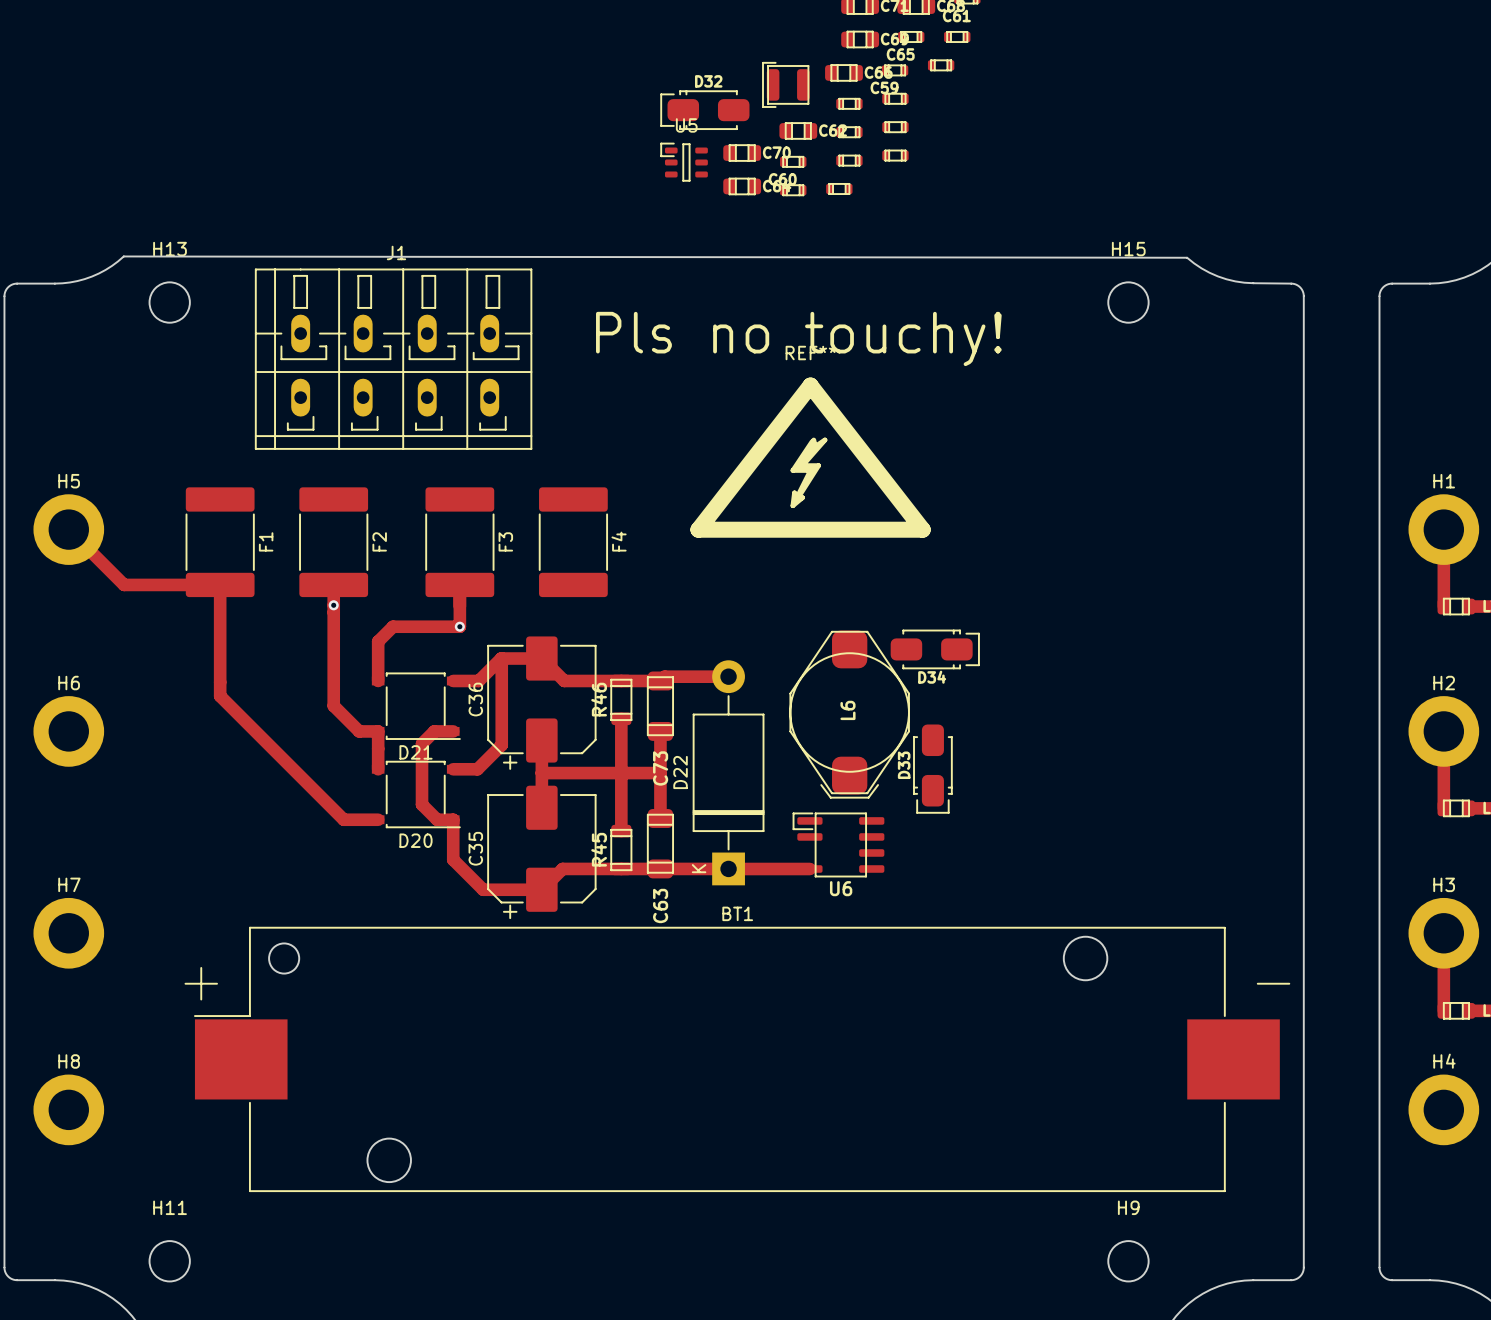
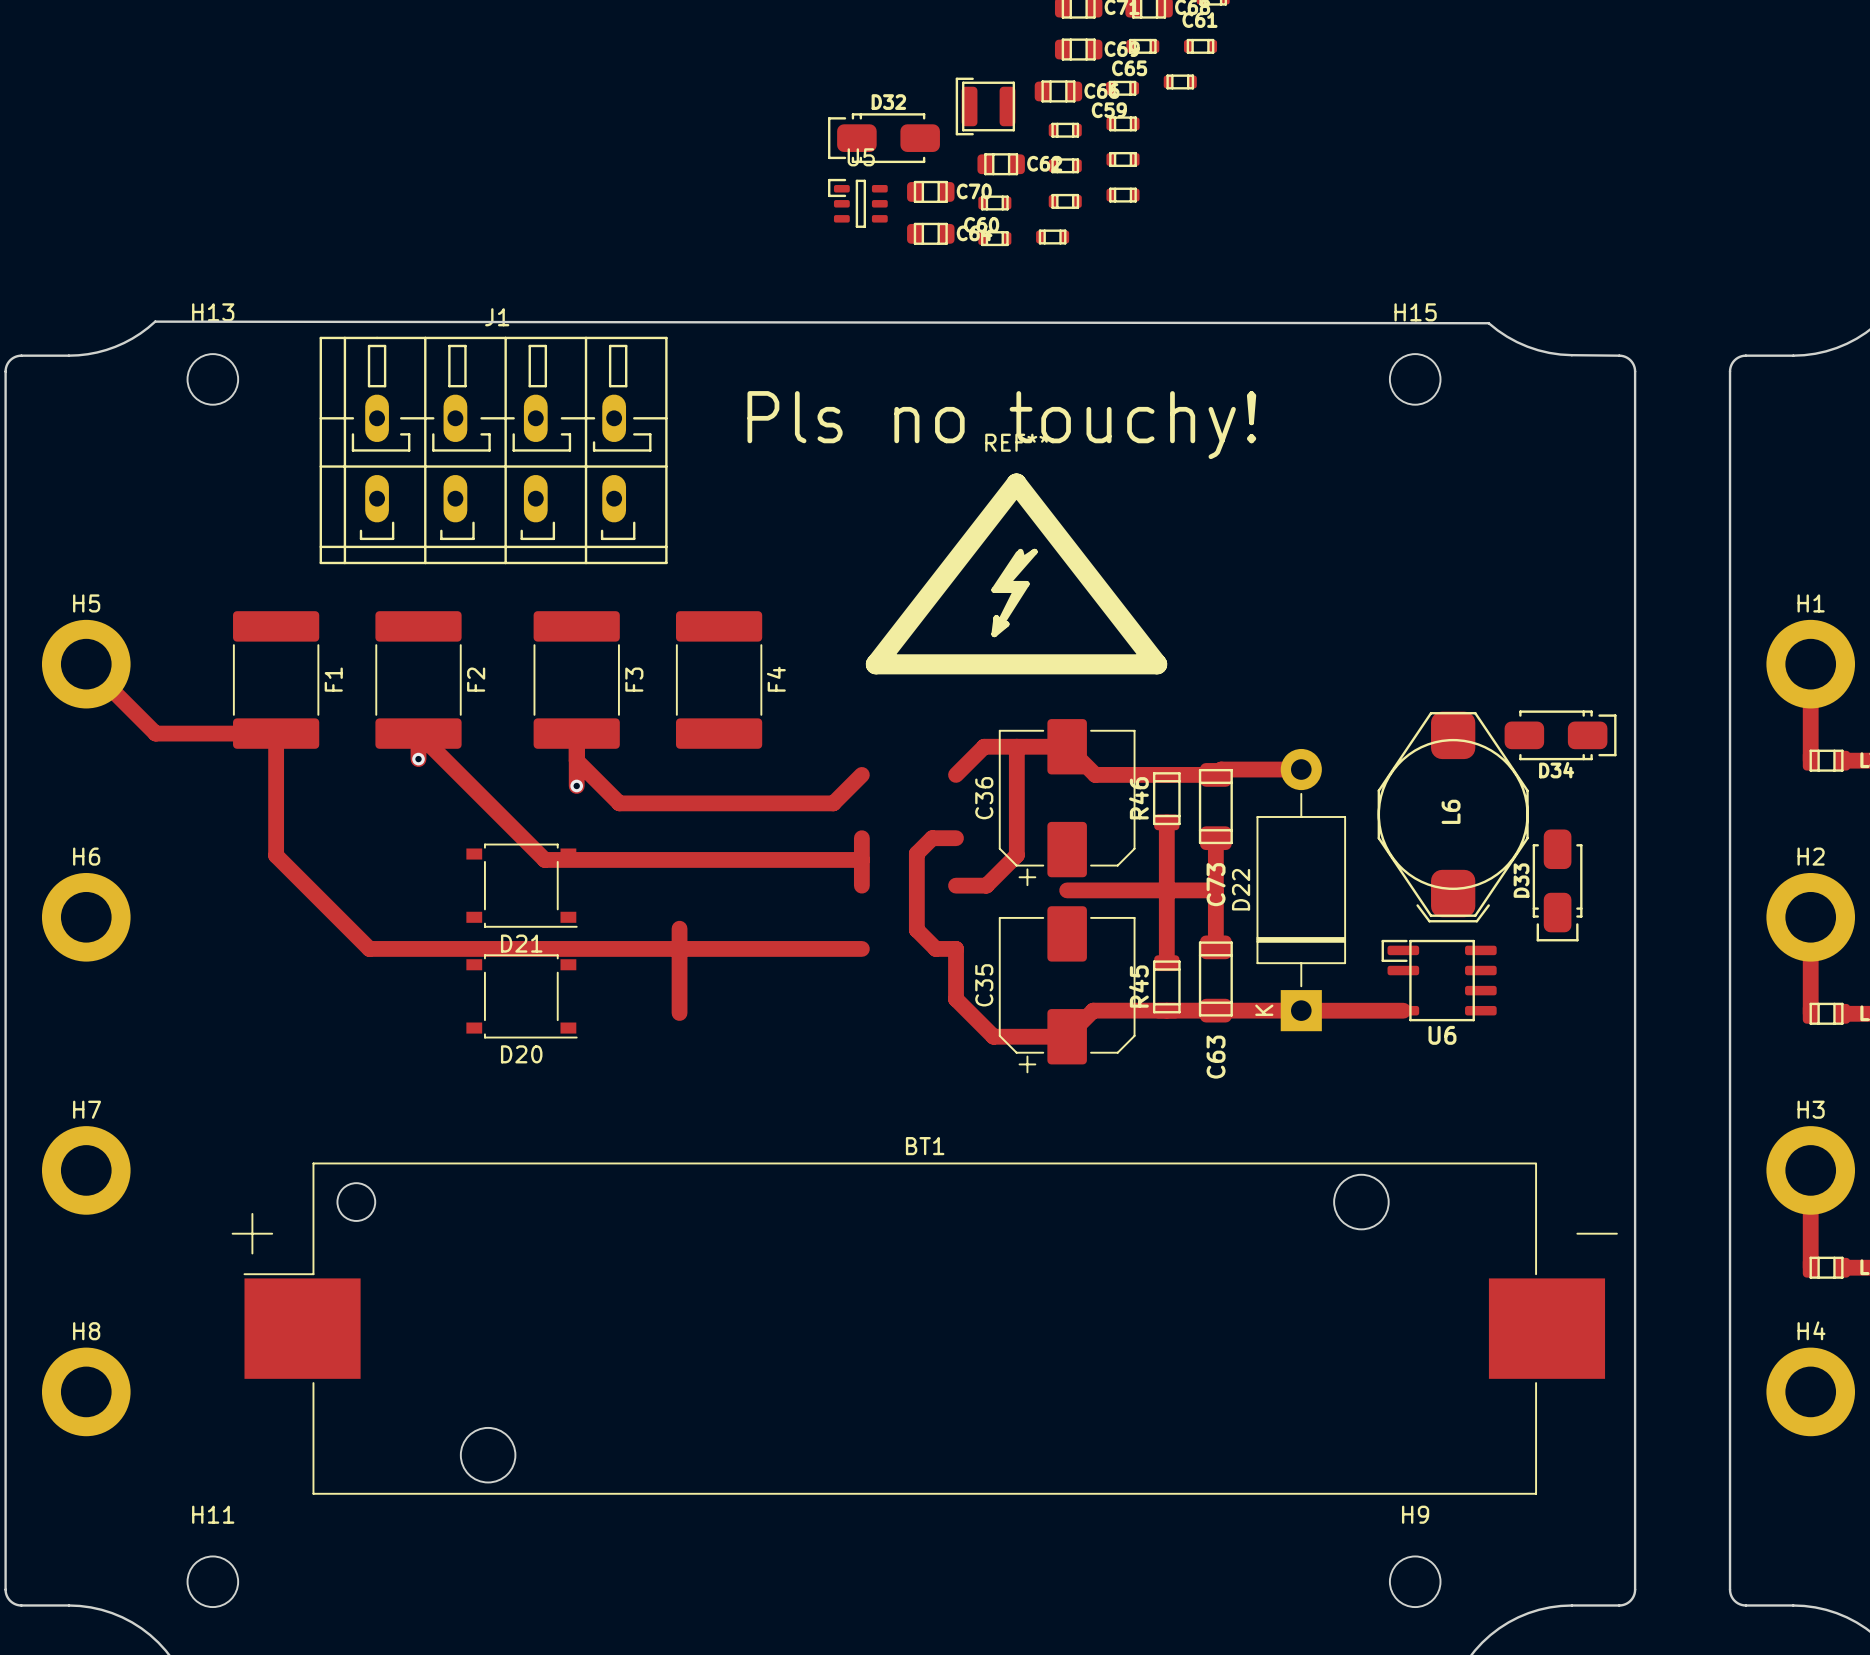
track: none -> (418, 733) (544, 859) (861, 859)
track: none -> (1016, 746) (1016, 855) (986, 885) (956, 885)
track: (333, 605) (333, 705) (359, 731) (378, 731) (378, 769) -> none
track: none -> (576, 760) (619, 803) (833, 803) (861, 774)
track: none -> (1301, 769) (1221, 769) (1215, 774) (1095, 774) (1067, 746) (984, 746) (956, 774)
track: (459, 626) (393, 626) (378, 641) (378, 680) -> none
D34 position: (935, 649) -> (1560, 735)
track: none -> (1166, 822) (1166, 963)
track: (501, 658) (501, 745) (477, 769) (453, 769) -> none
track: none -> (861, 838) (861, 885)
track: none -> (956, 838) (932, 838) (916, 853) (916, 929) (935, 948) (956, 948) (956, 999) (993, 1036) (1067, 1036) (1093, 1010) (1301, 1010)
track: none -> (1215, 838) (1215, 947)
track: (728, 676) (664, 676) (660, 680) (564, 680) (541, 658) (501, 658) (478, 680) (453, 680) -> none
track: (220, 682) (220, 696) (343, 819) (378, 819) -> (276, 855) (369, 948) (861, 948)
R46 position: (621, 699) -> (1166, 798)
C36 position: (541, 703) -> (1067, 802)
C73 position: (660, 706) -> (1215, 806)
track: none -> (1067, 890) (1214, 890) (1215, 891)
L6 position: (849, 714) -> (1453, 817)
track: (621, 718) (621, 831) -> none
track: (453, 731) (434, 731) (422, 743) (422, 804) (437, 819) (453, 819) (453, 859) (483, 889) (541, 889) (562, 868) (728, 868) -> none
track: (660, 731) (660, 818) -> none
D33 position: (932, 769) -> (1557, 885)
D22 position: (728, 772) -> (1301, 890)
track: (541, 773) (660, 774) -> none
track: none -> (1301, 1010) (1403, 1010)
C63 position: (660, 843) -> (1215, 978)
U6 position: (838, 844) -> (1439, 980)
R45 position: (621, 850) -> (1166, 986)
C35 position: (541, 852) -> (1067, 989)
track: (728, 869) (809, 869) -> none

